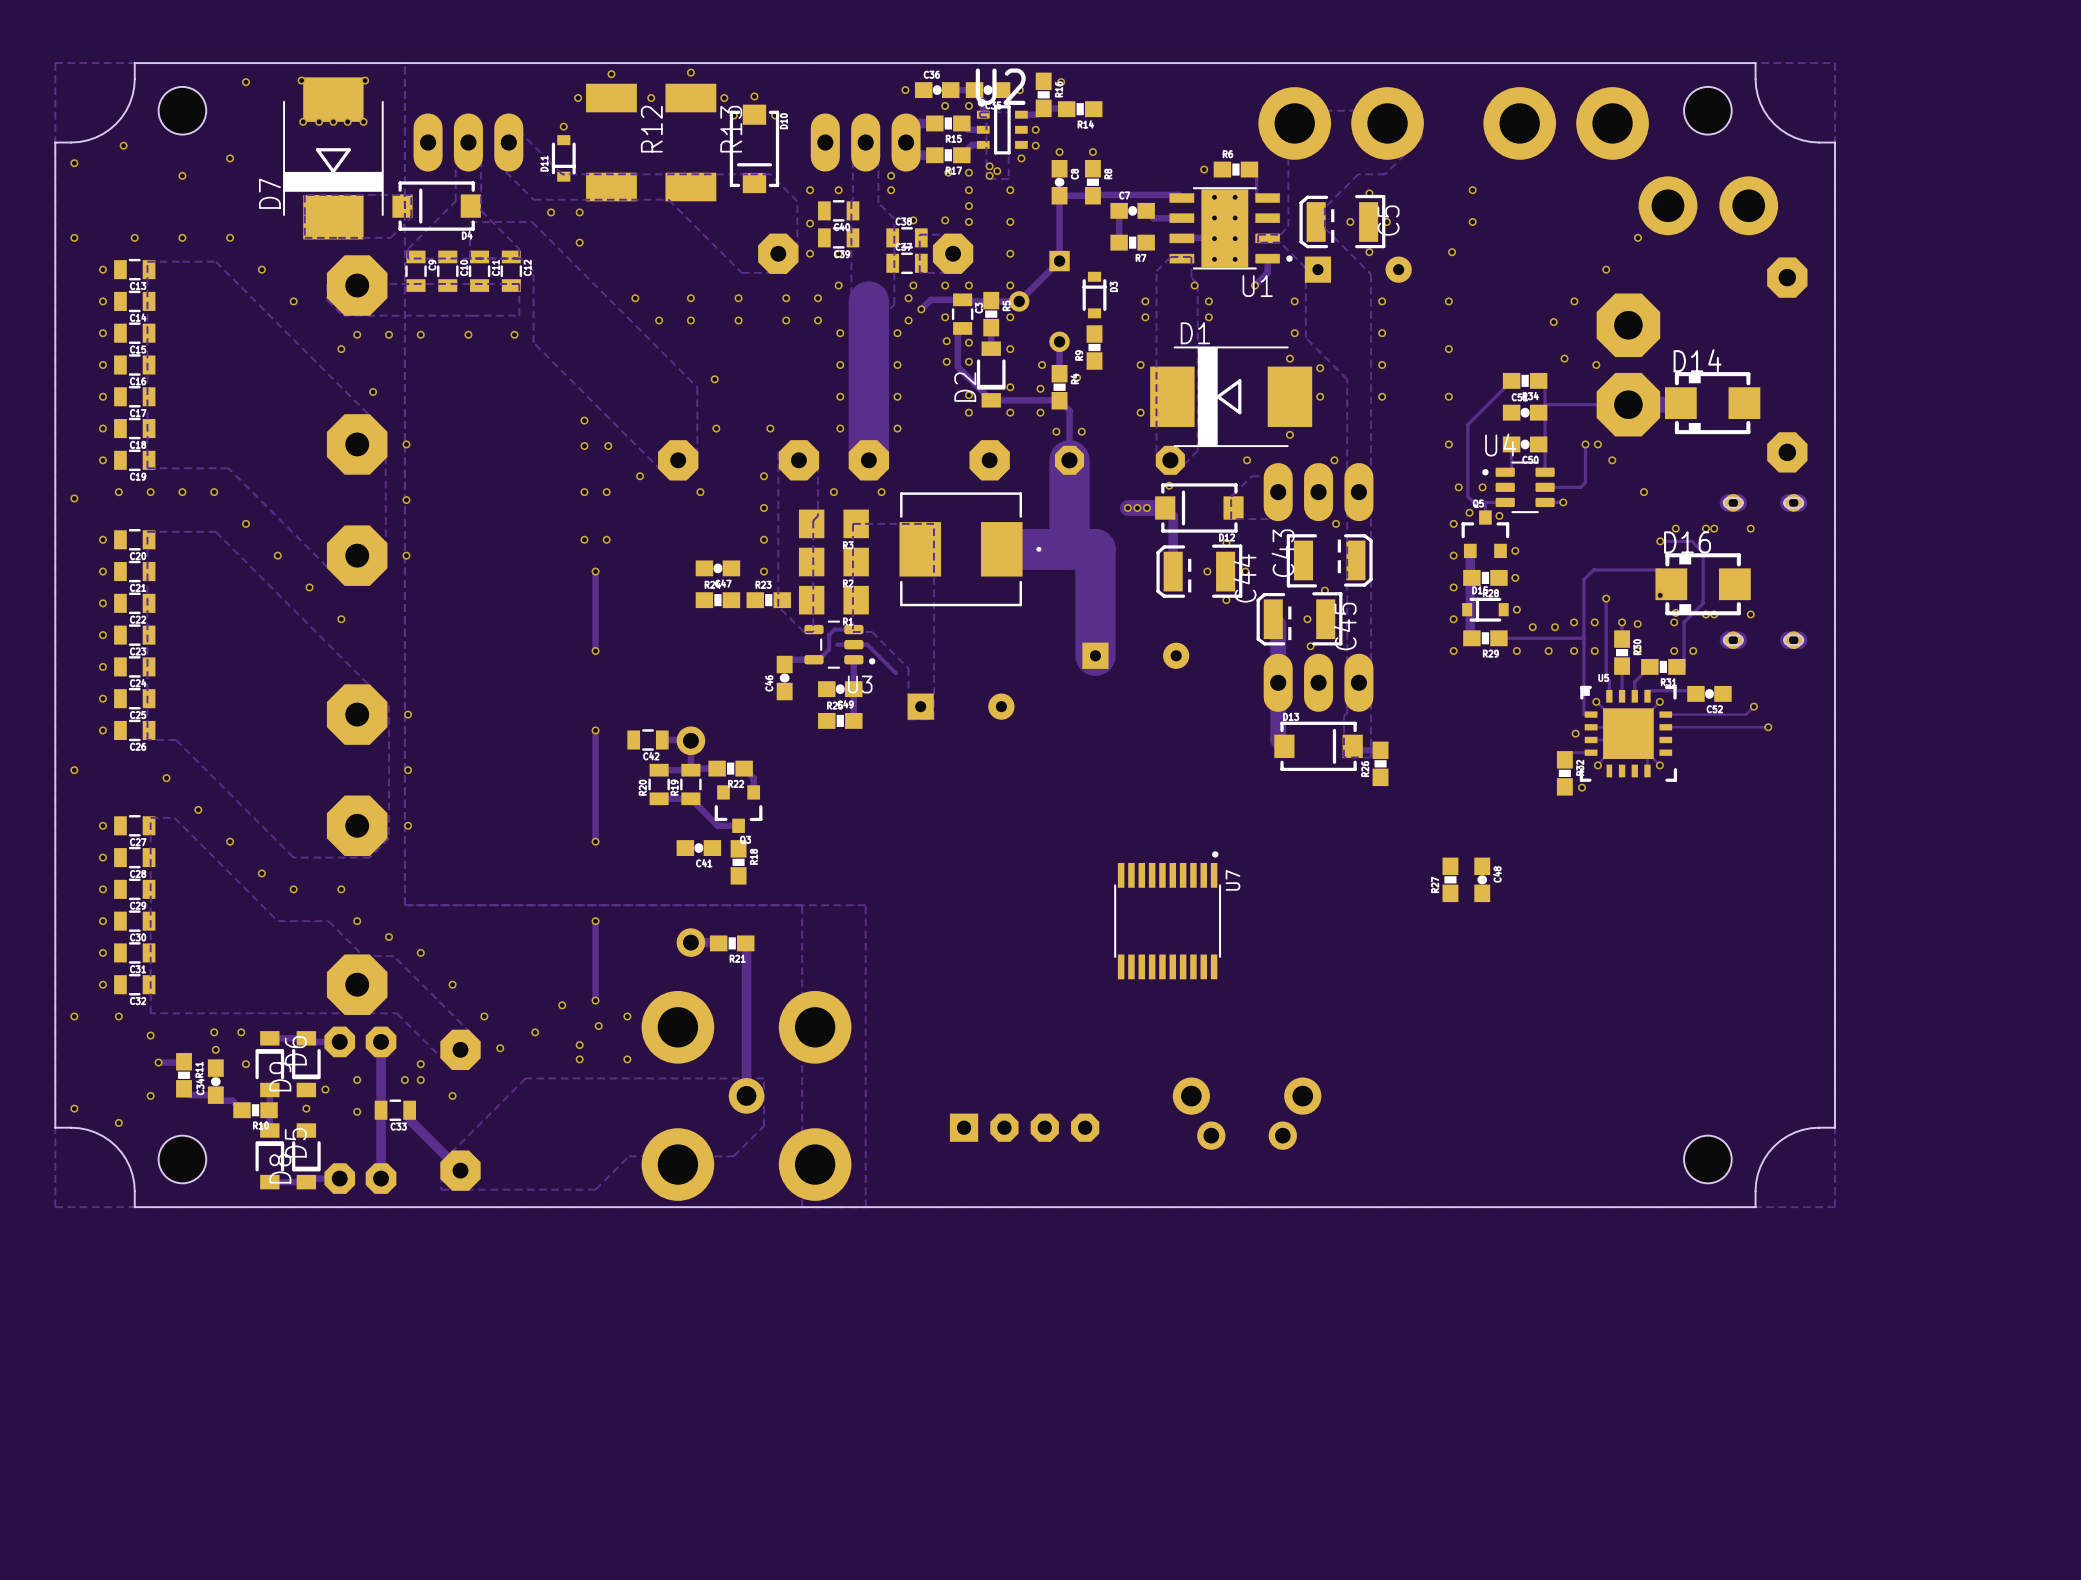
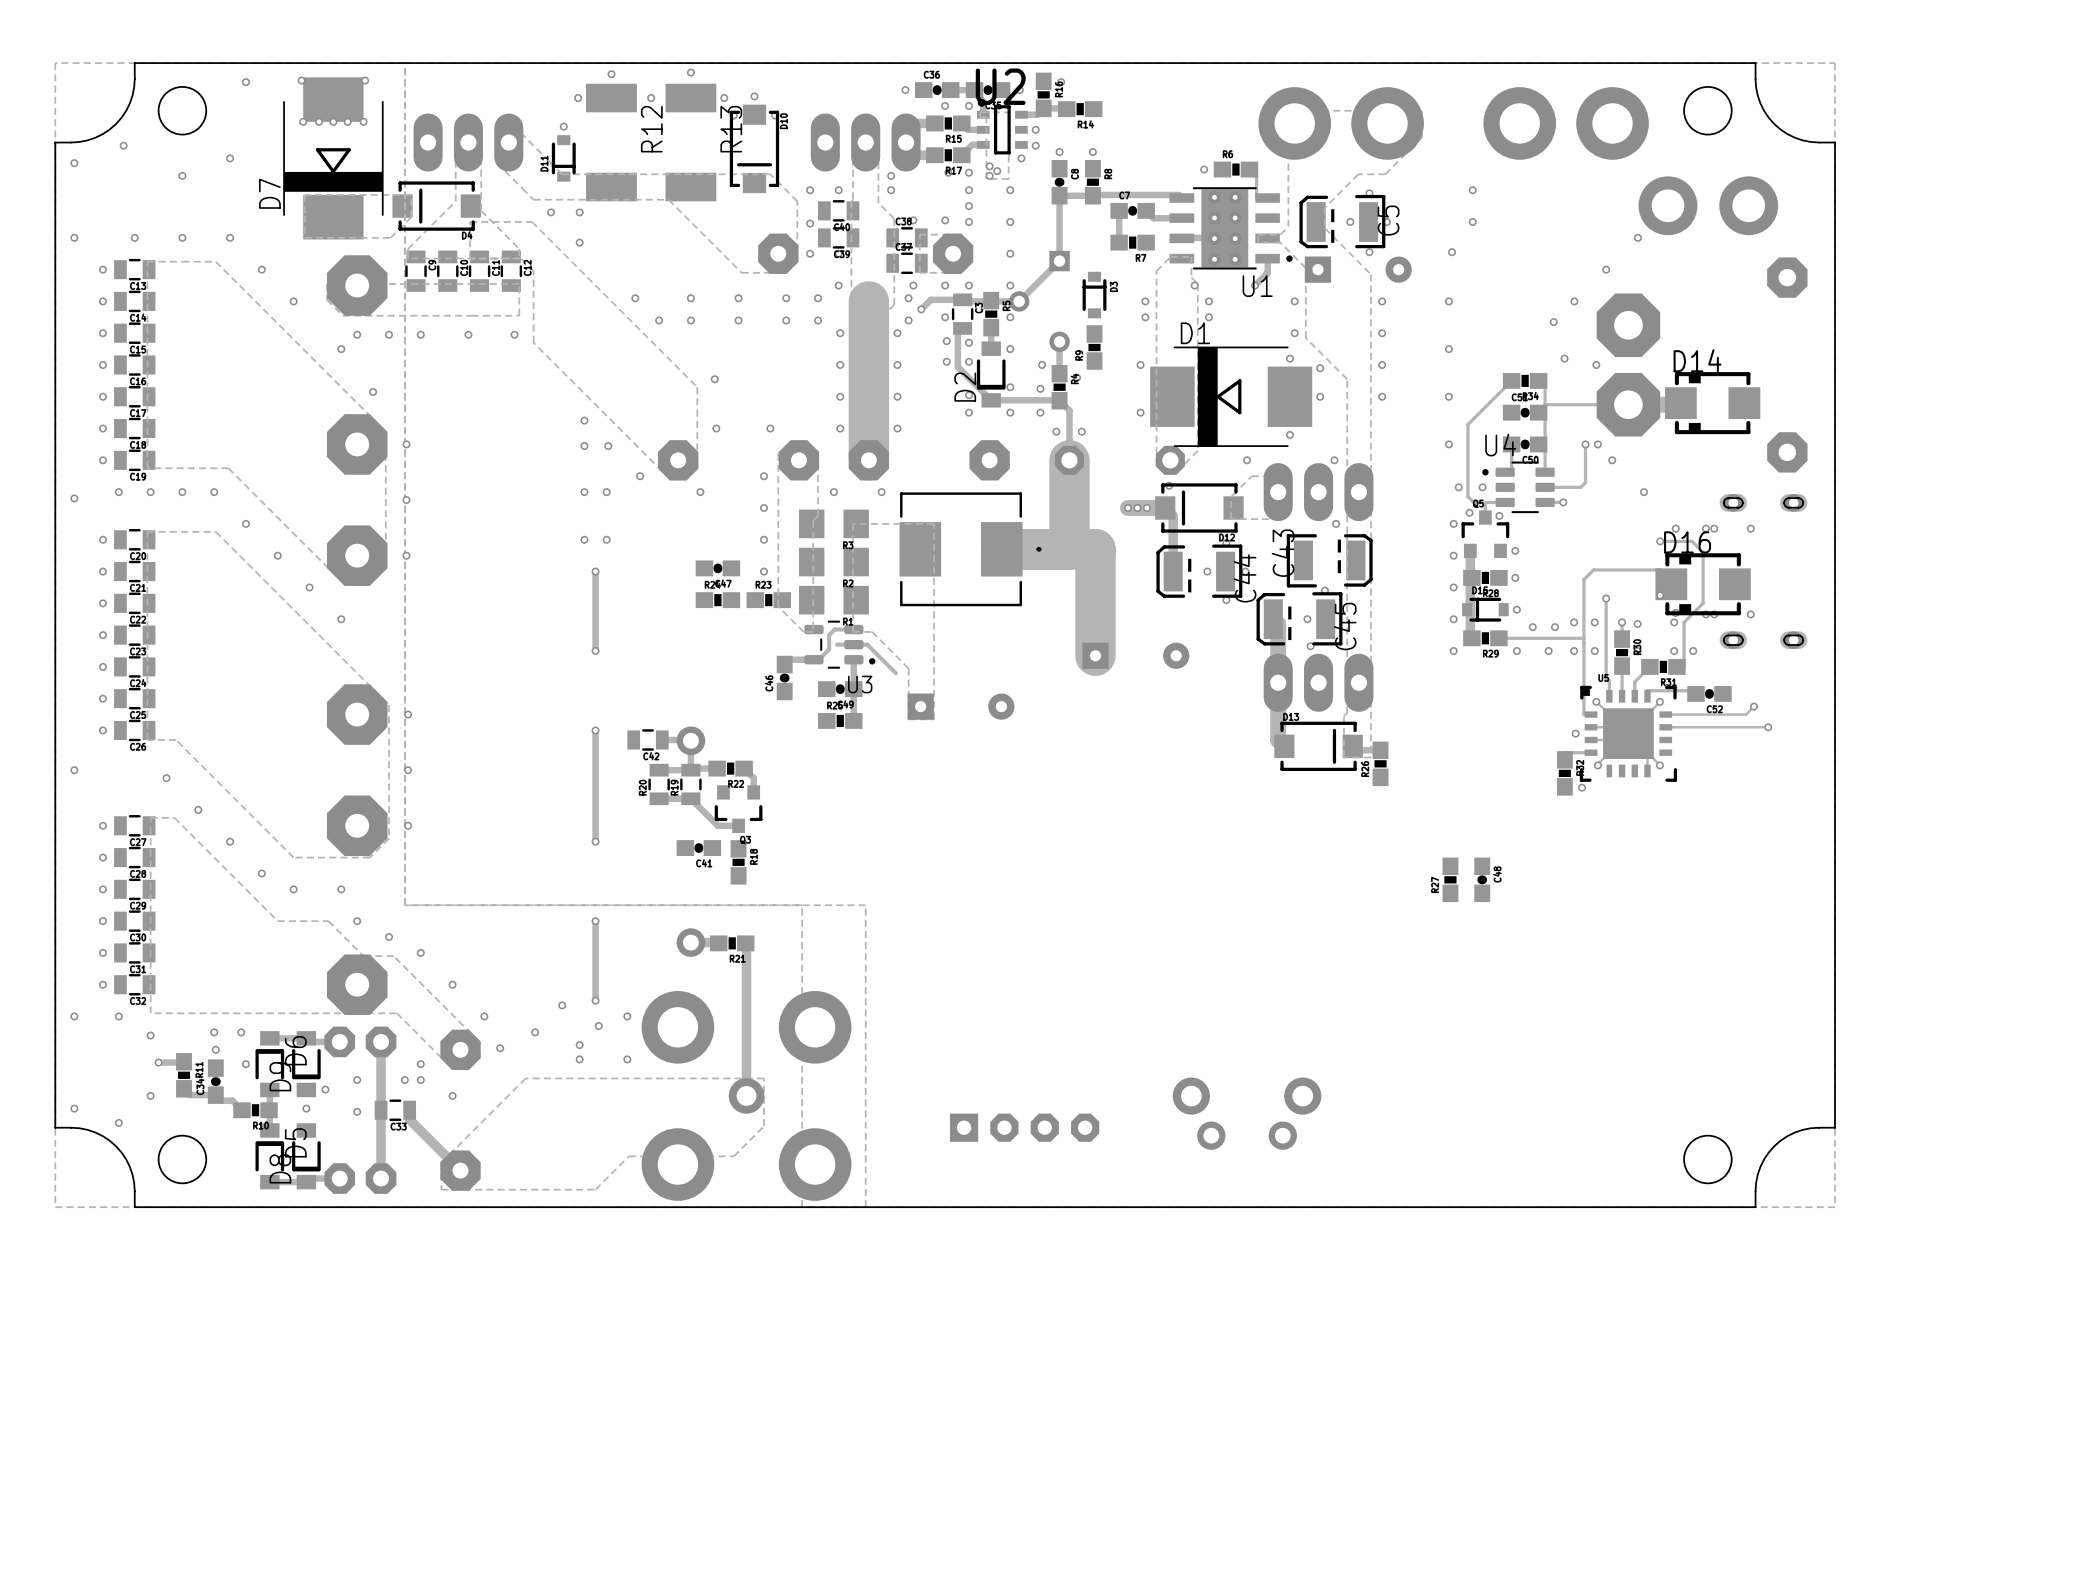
U7: (1167, 915) -> none

